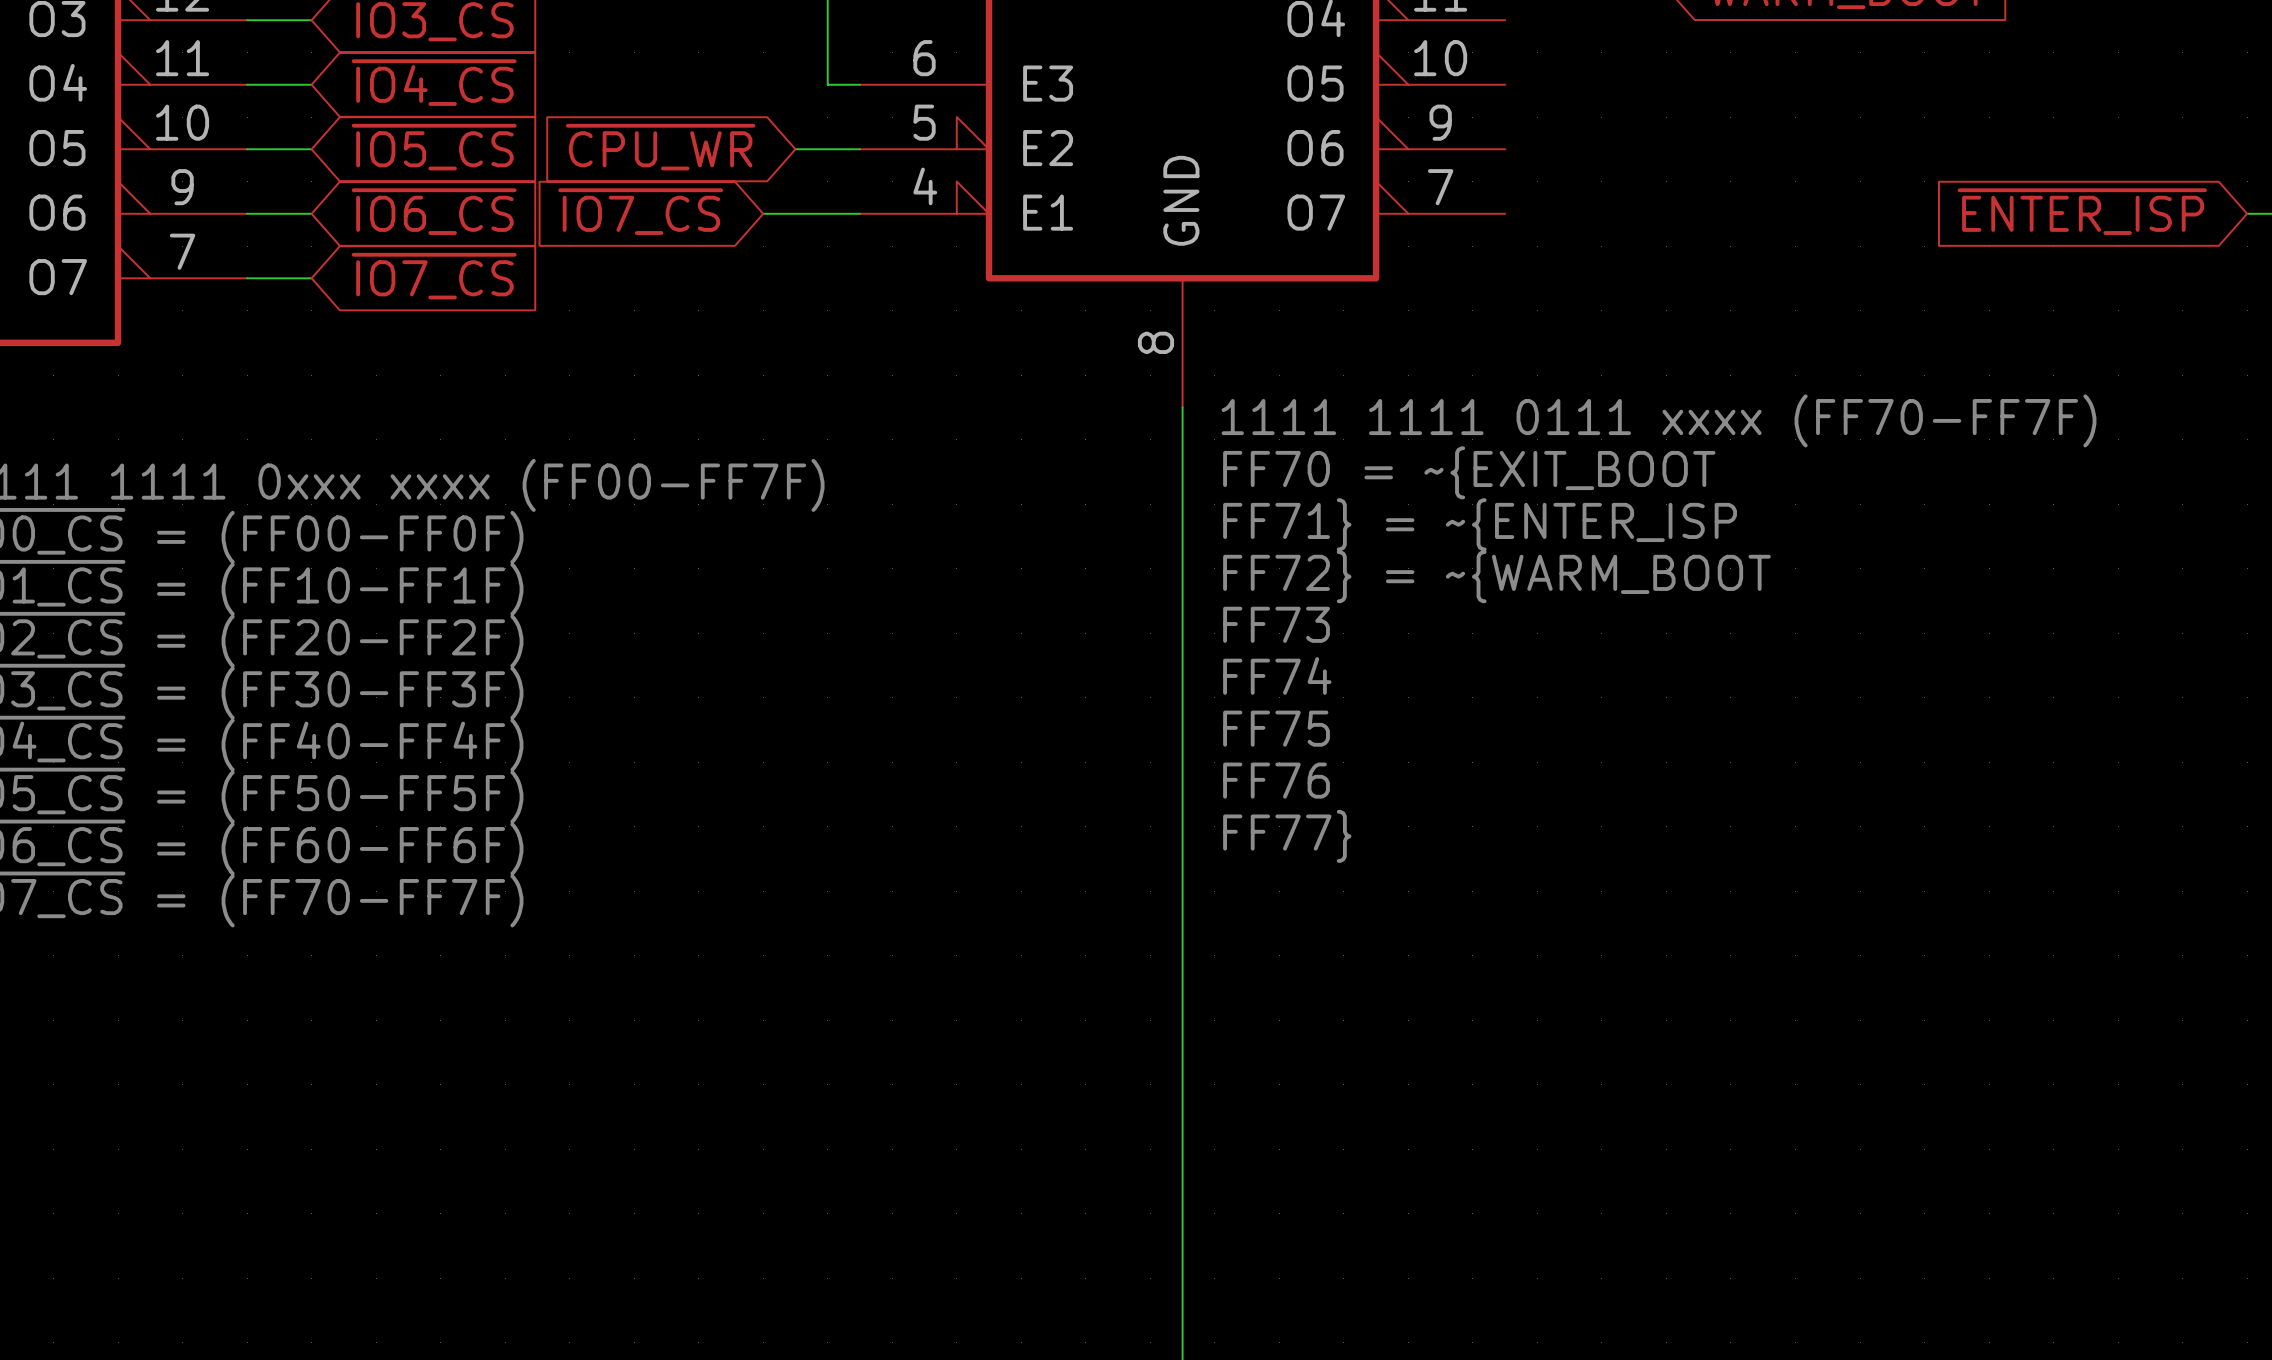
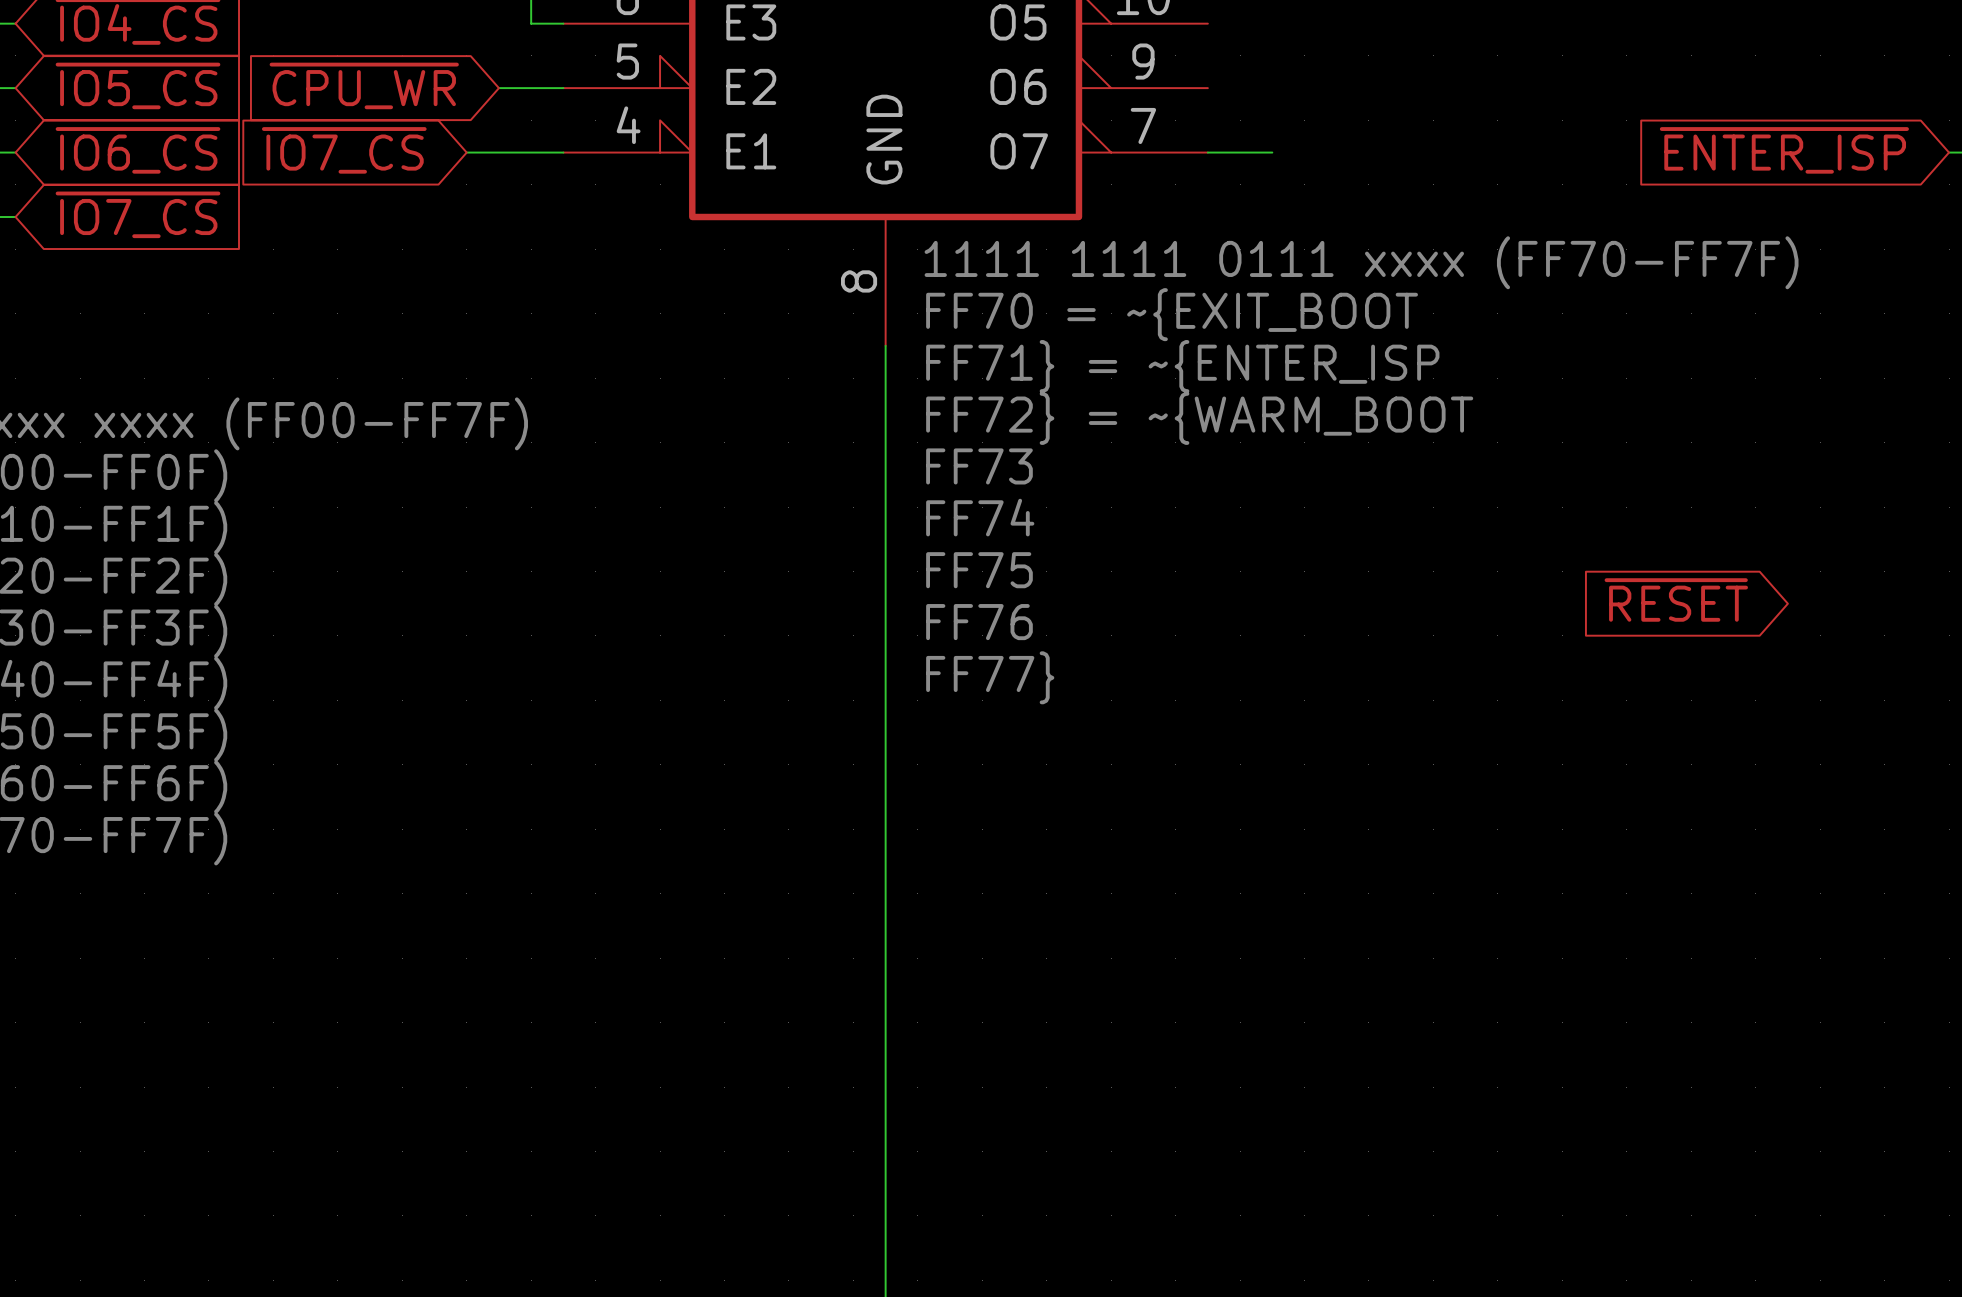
wire: none -> (1207, 152) (1272, 152)
text position: 1111 1111 0111 xxxx (FF70-FF7F) (1659, 420) -> 1111 1111 0111 xxxx (FF70-FF7F) (1361, 262)
text position: FF70 = ~{EXIT_BOOT (1469, 472) -> FF70 = ~{EXIT_BOOT (1172, 314)
text position: FF71} = ~{ENTER_ISP (1480, 524) -> FF71} = ~{ENTER_ISP (1182, 366)
text position: FF72} = ~{WARM_BOOT (1496, 576) -> FF72} = ~{WARM_BOOT (1199, 418)
text position: FF73 (1276, 624) -> FF73 (979, 466)
global label: none -> ~{RESET} (1676, 599)
text position: FF74 (1277, 675) -> FF74 (980, 517)
text position: FF75 (1276, 728) -> FF75 (979, 570)
text position: FF76 (1276, 780) -> FF76 (979, 622)
text position: FF77} (1287, 836) -> FF77} (990, 677)

